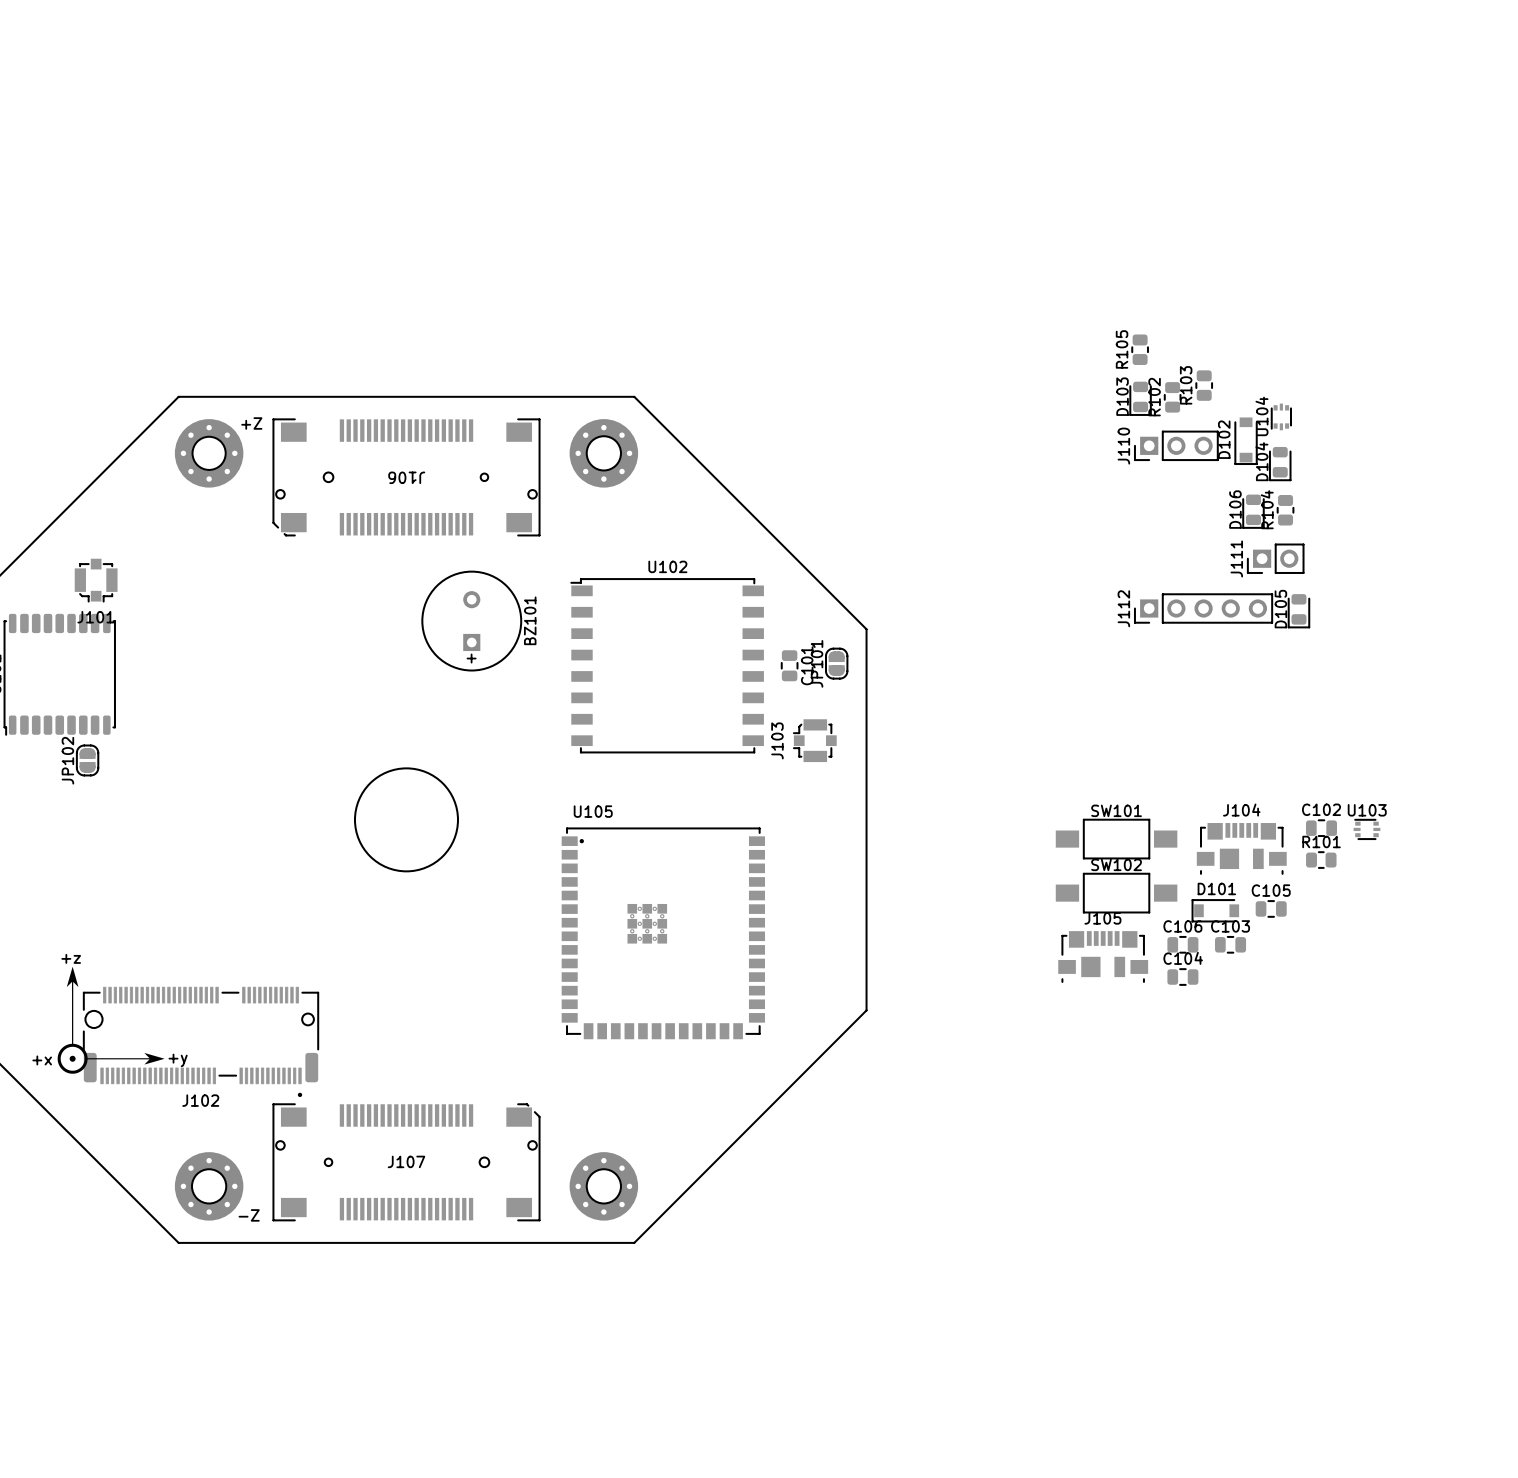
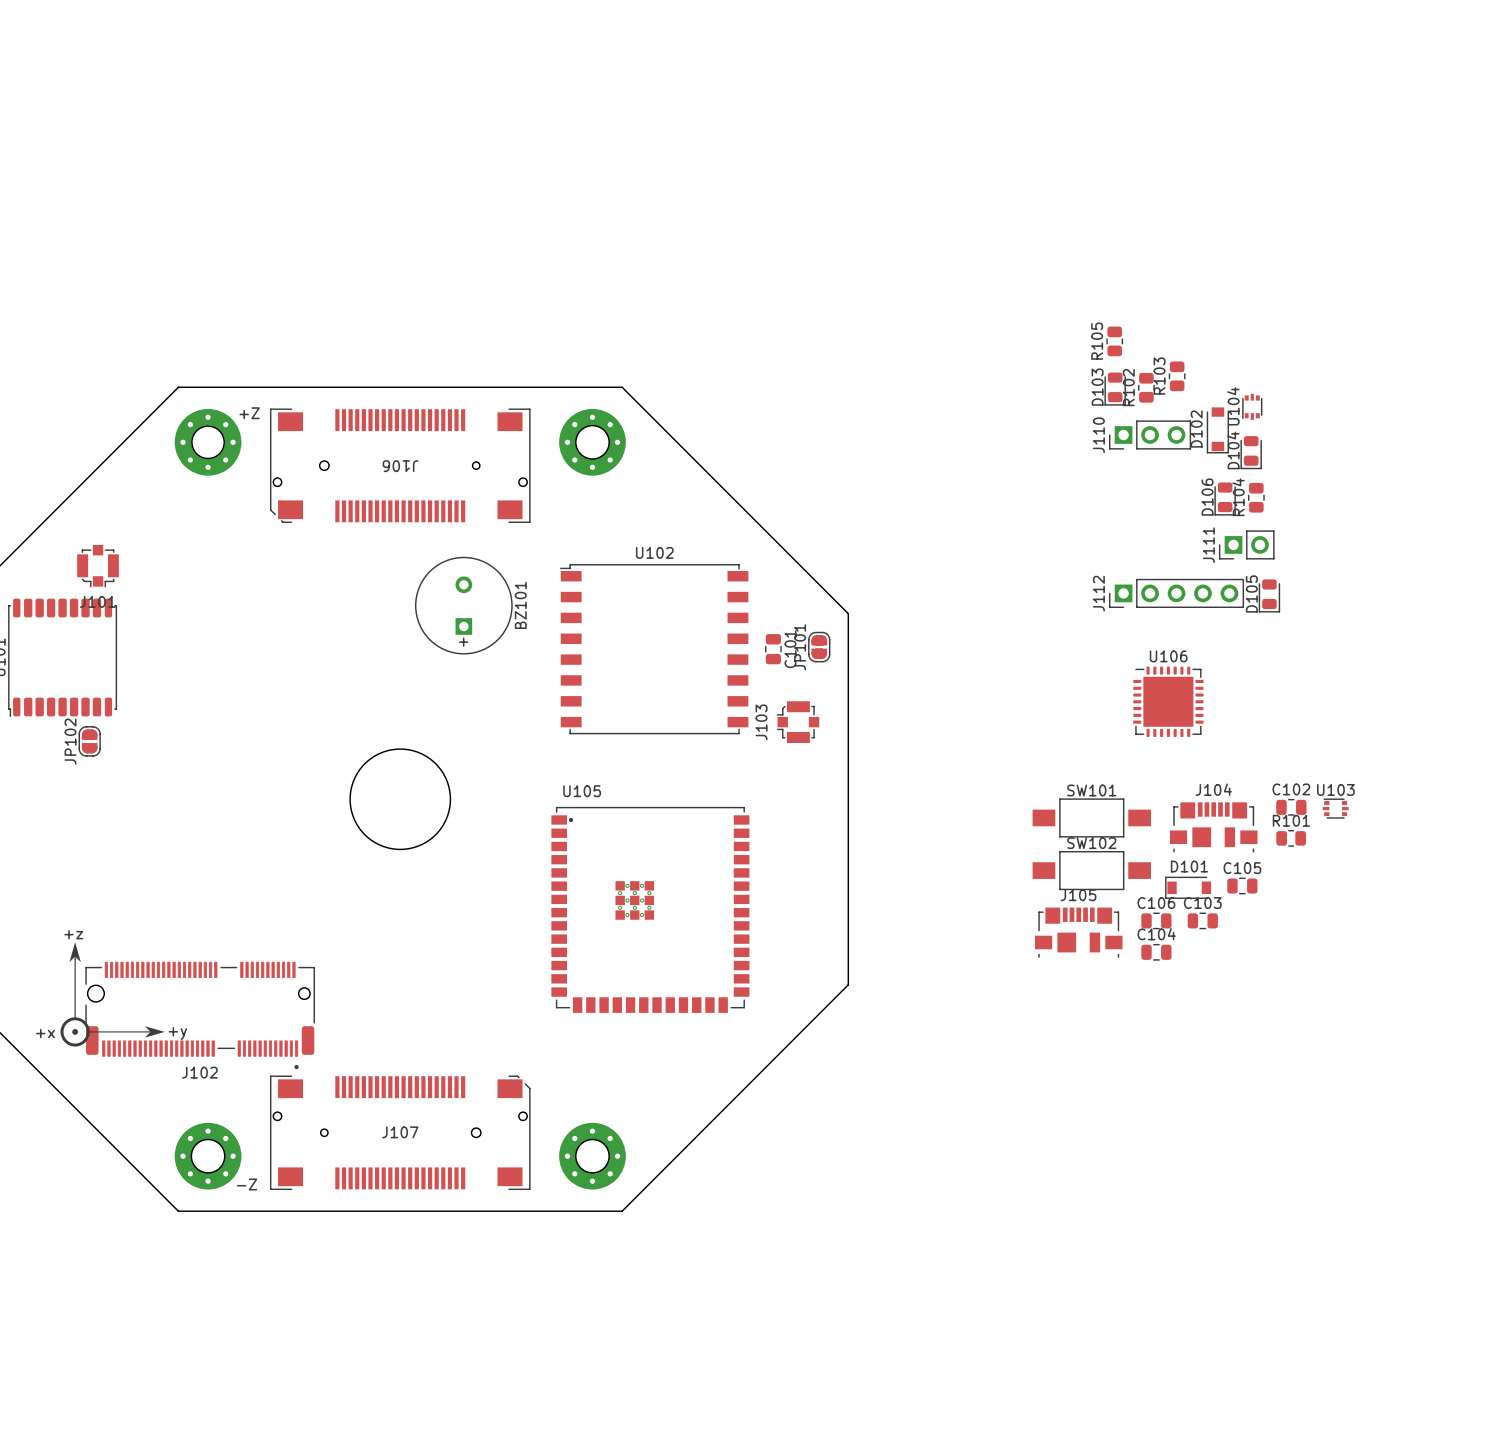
U106: none -> (1168, 701)

